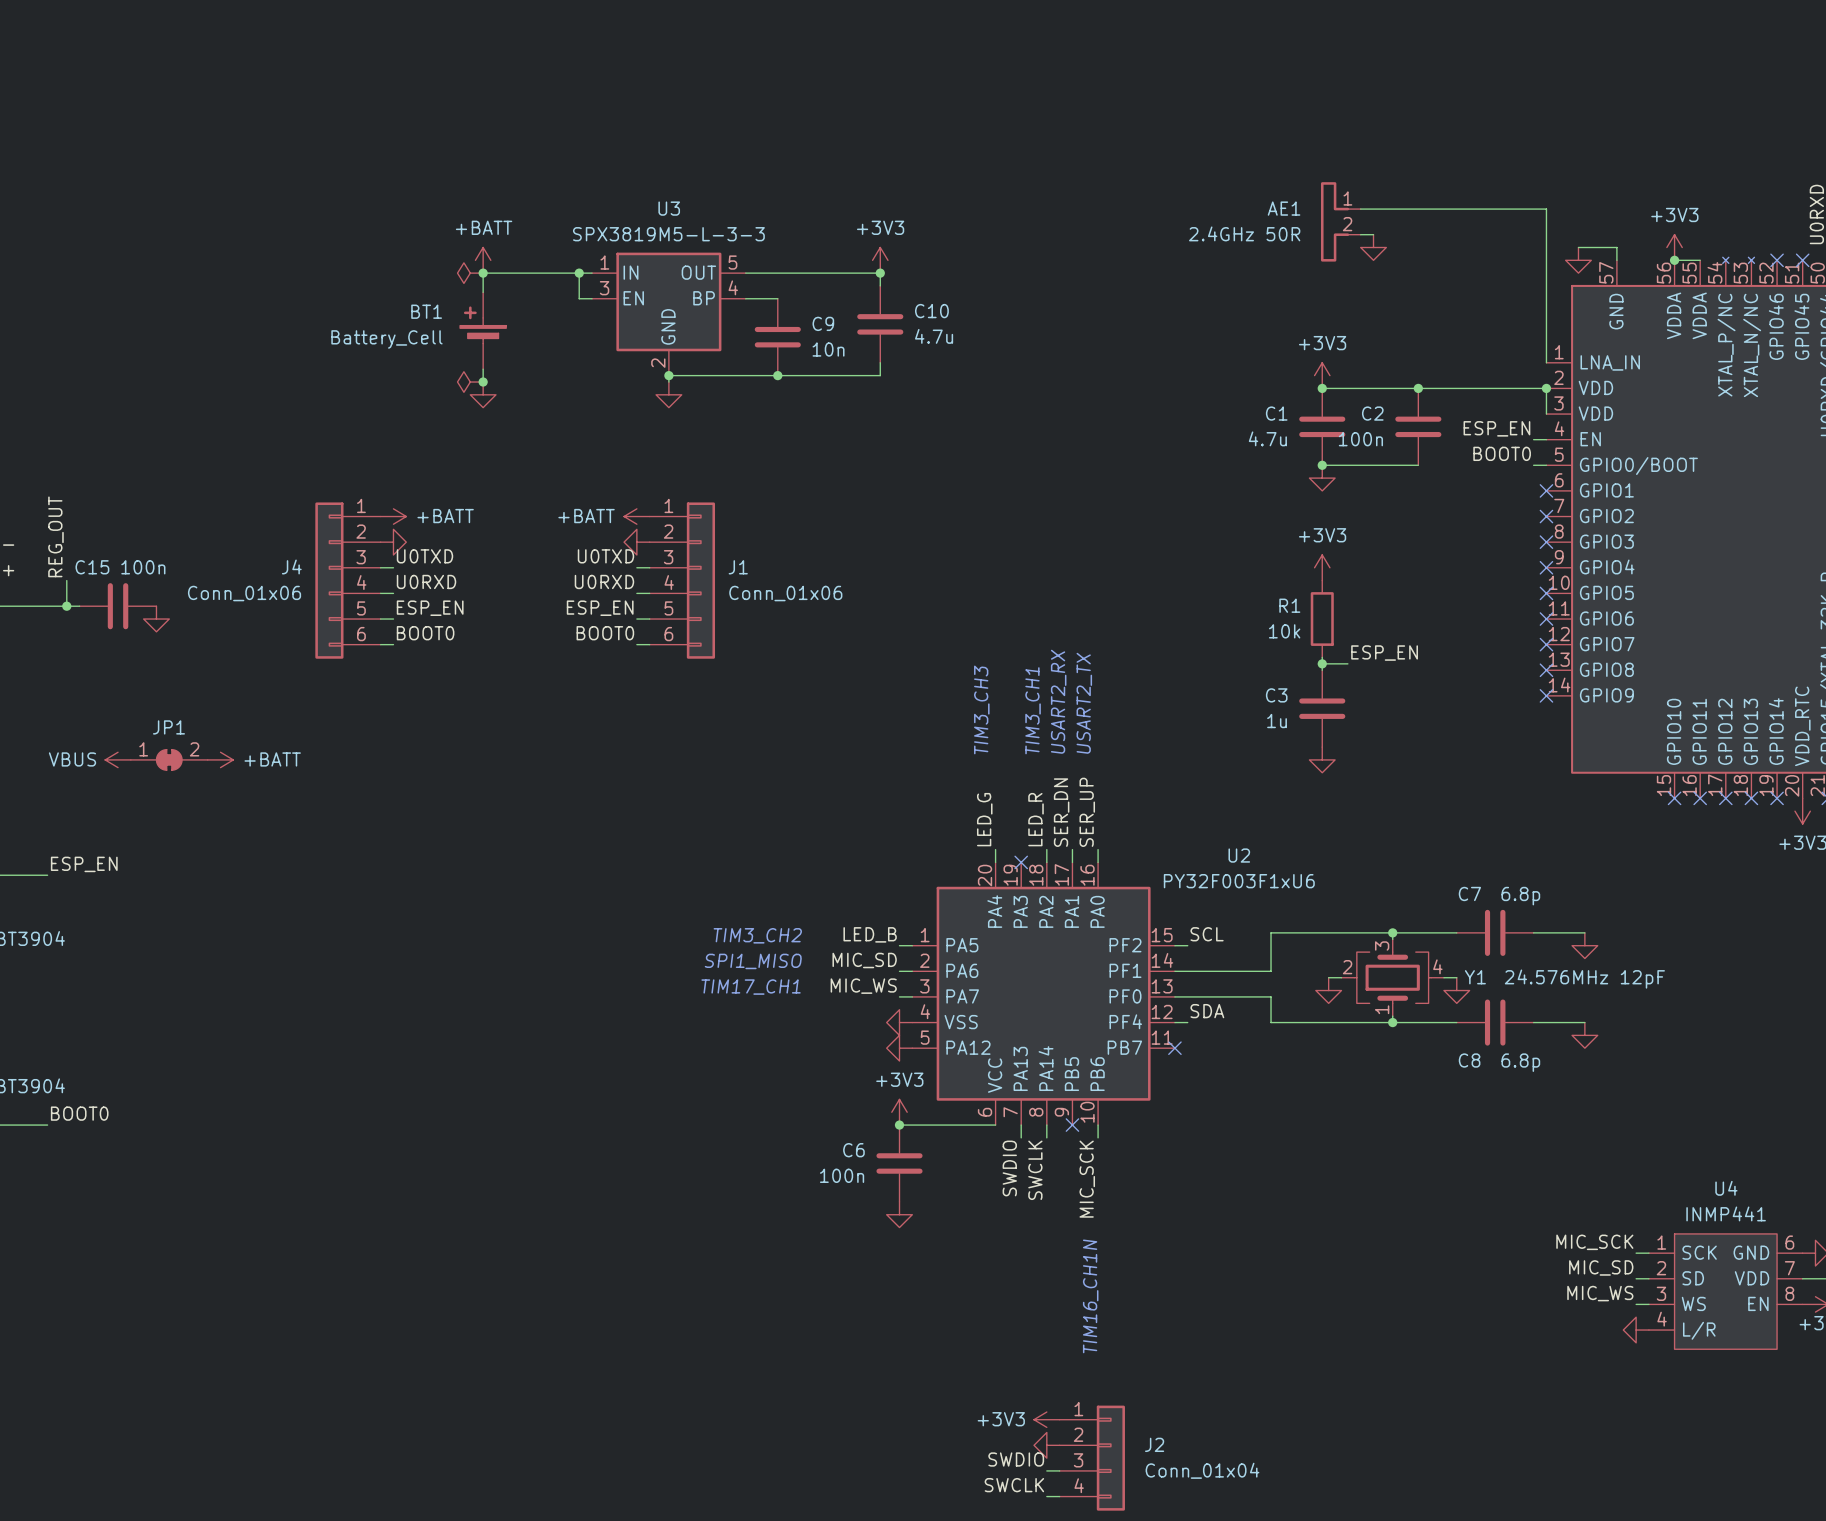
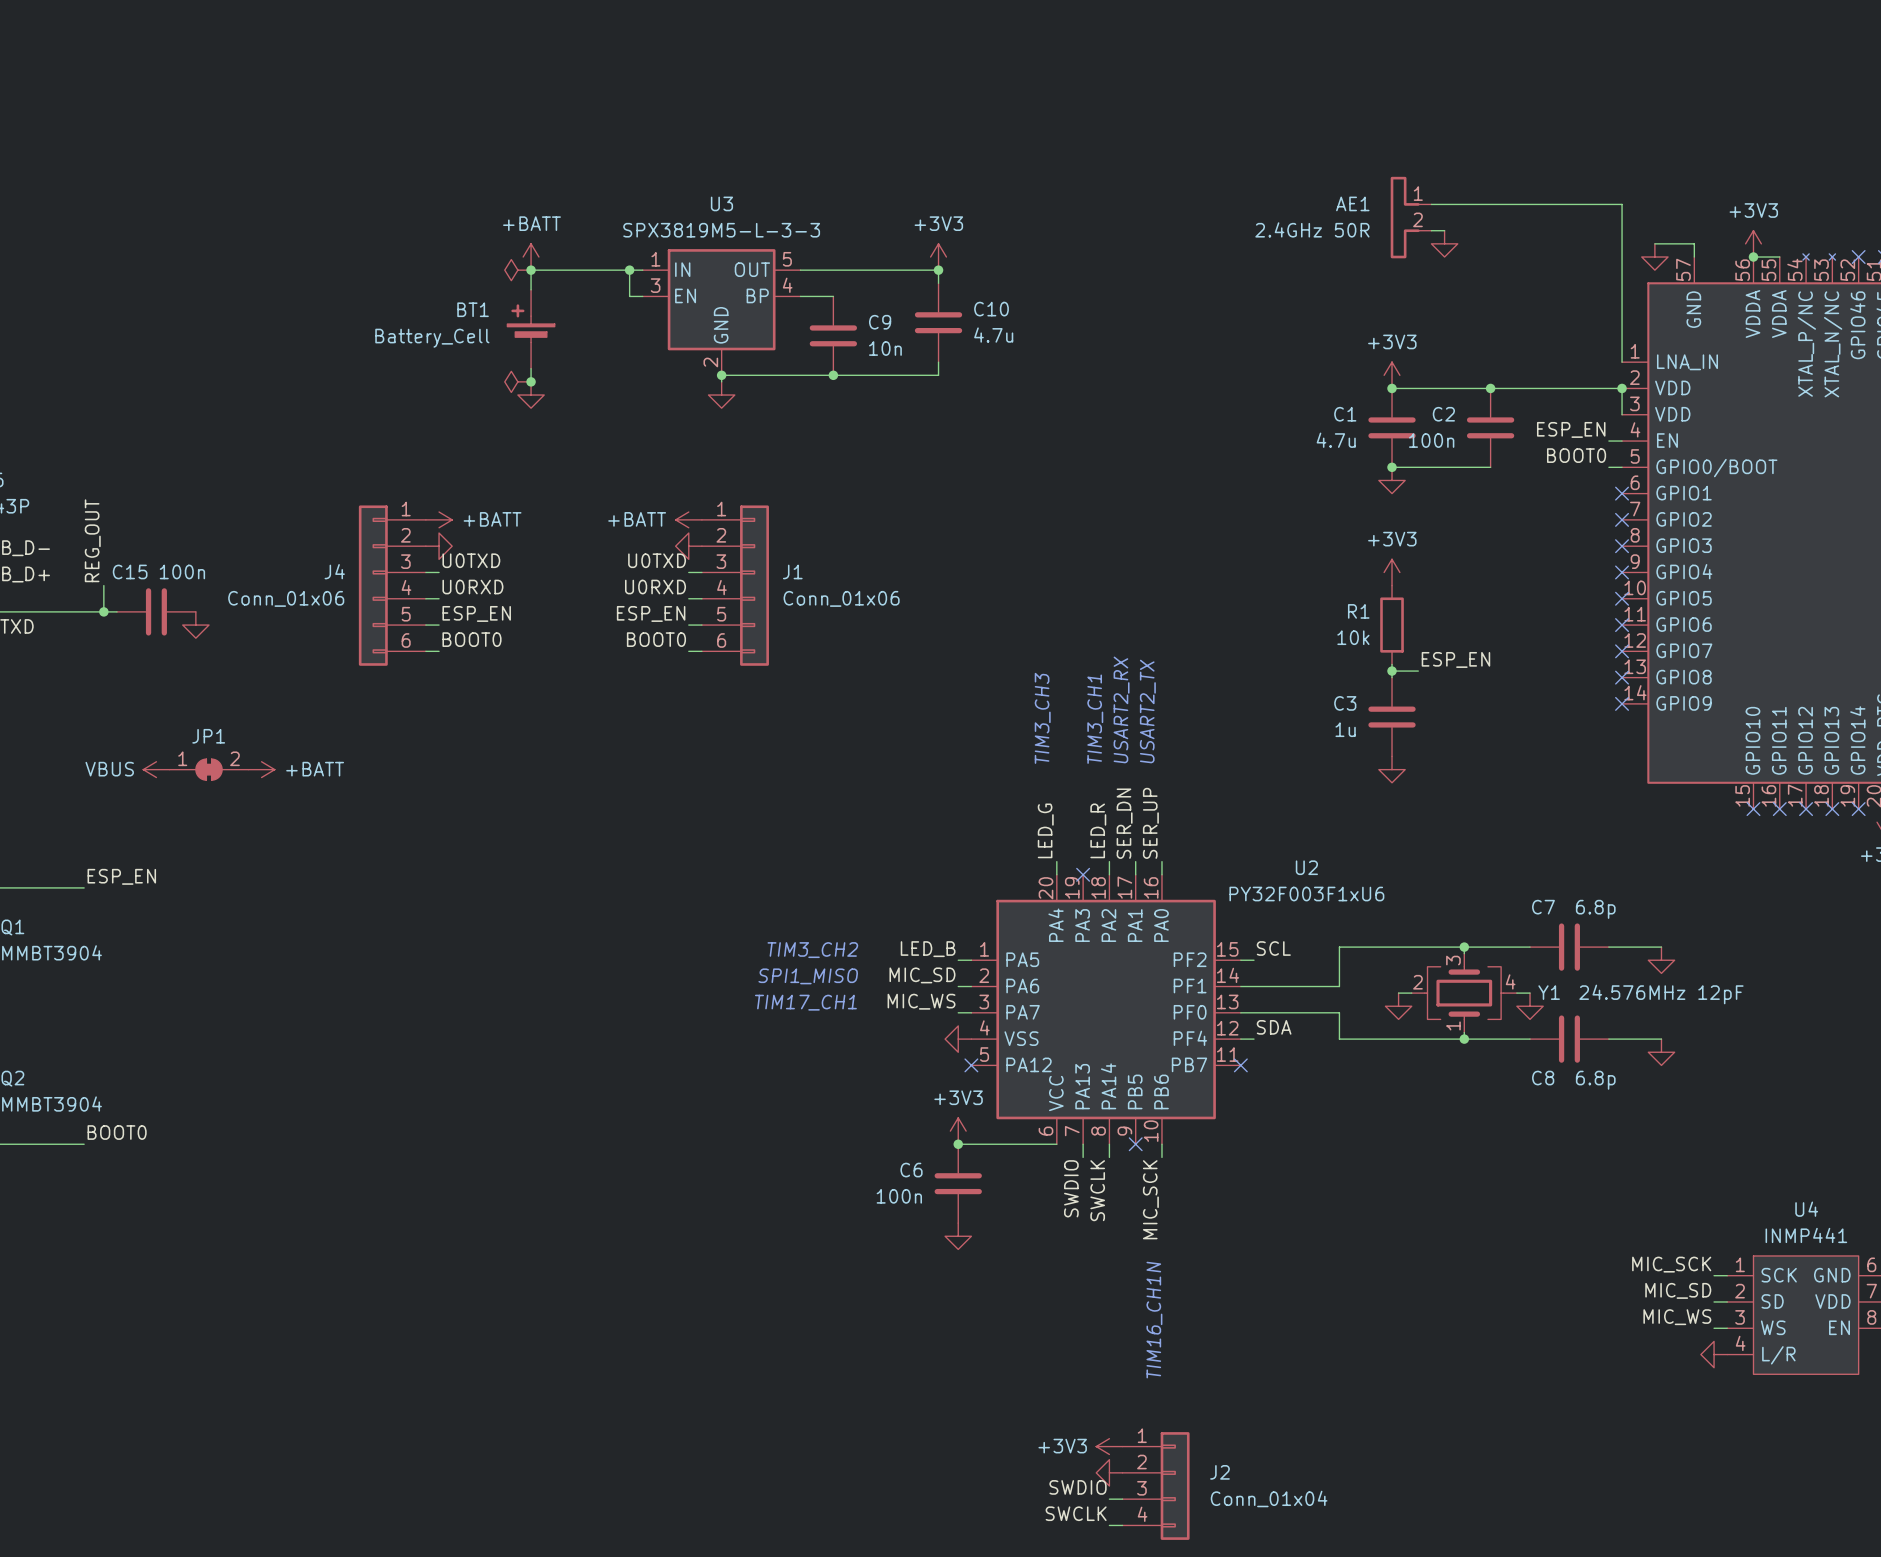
power symbol: (899, 1048) -> none
no-connect mark: none -> (971, 1065)

